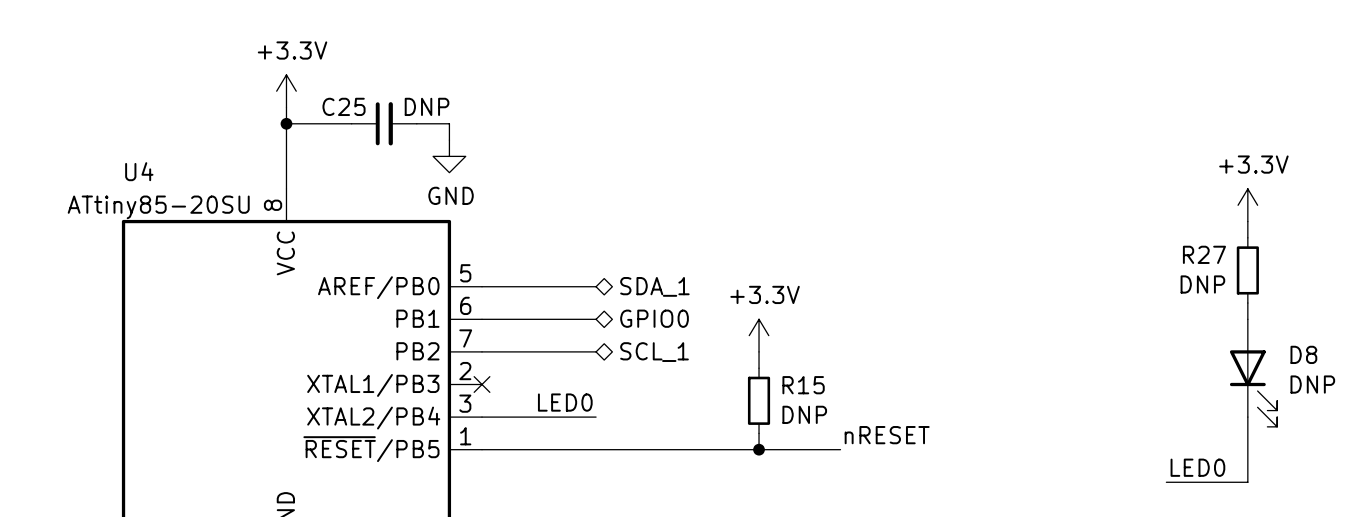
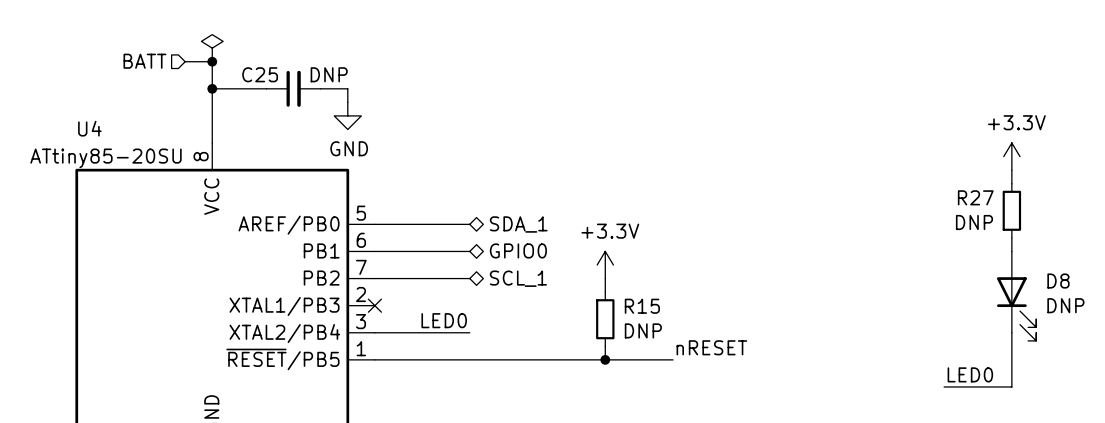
power symbol: none -> (212, 48)
hierarchical label: none -> BATT (144, 61)
wire: none -> (185, 61) (212, 61) (212, 75)
power symbol: +3.3V (286, 91) -> none
junction: none -> (212, 61)

